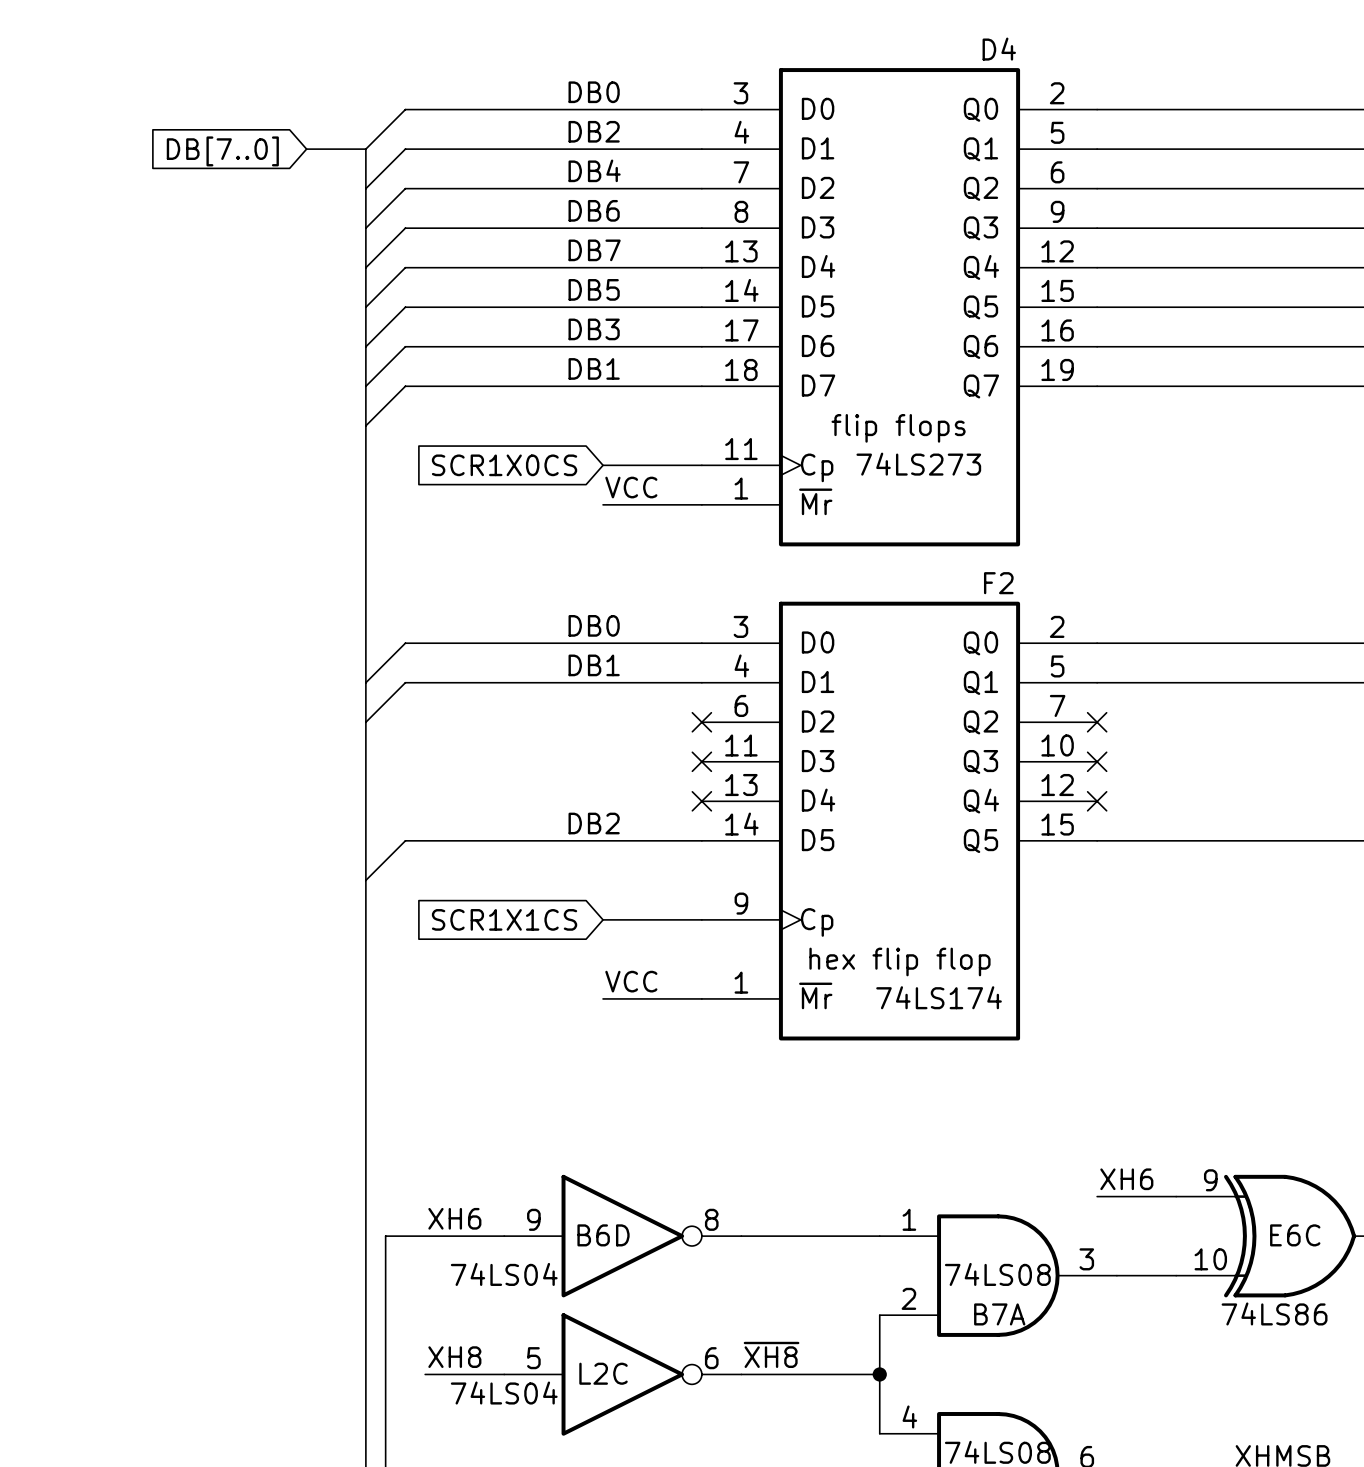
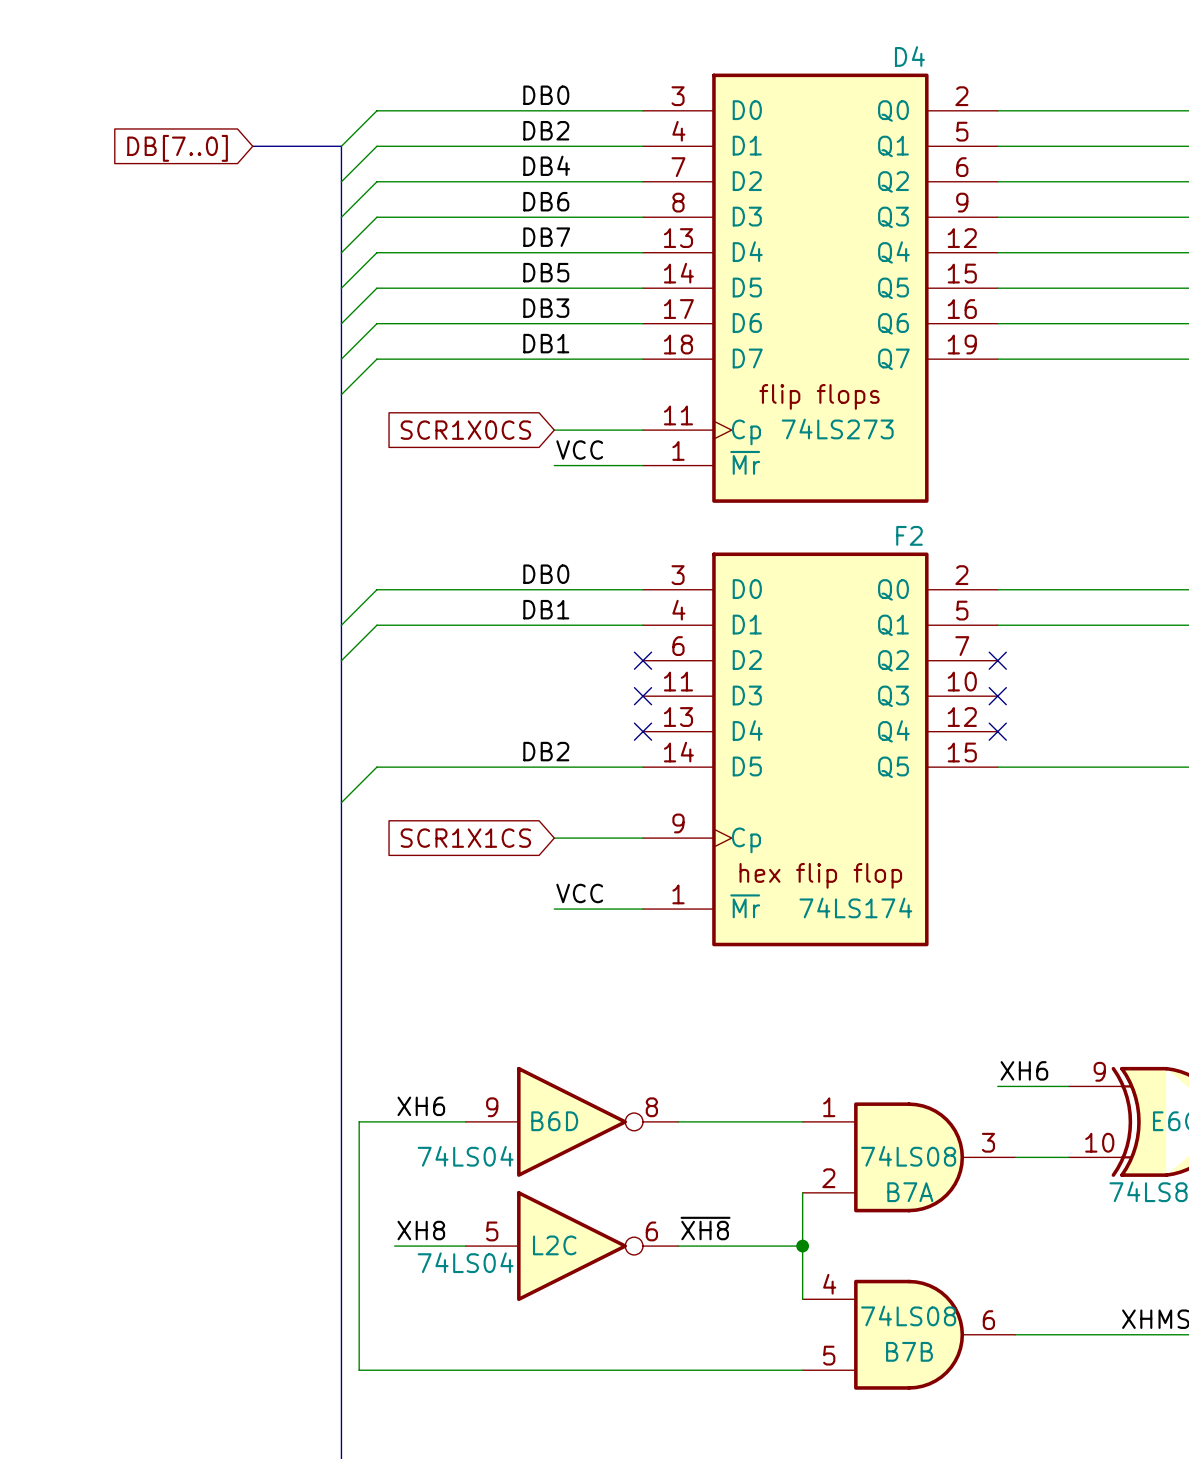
bus: none -> (252, 146) (288, 146)
global label position: DB[7..0] (222, 151) -> DB[7..0] (177, 148)

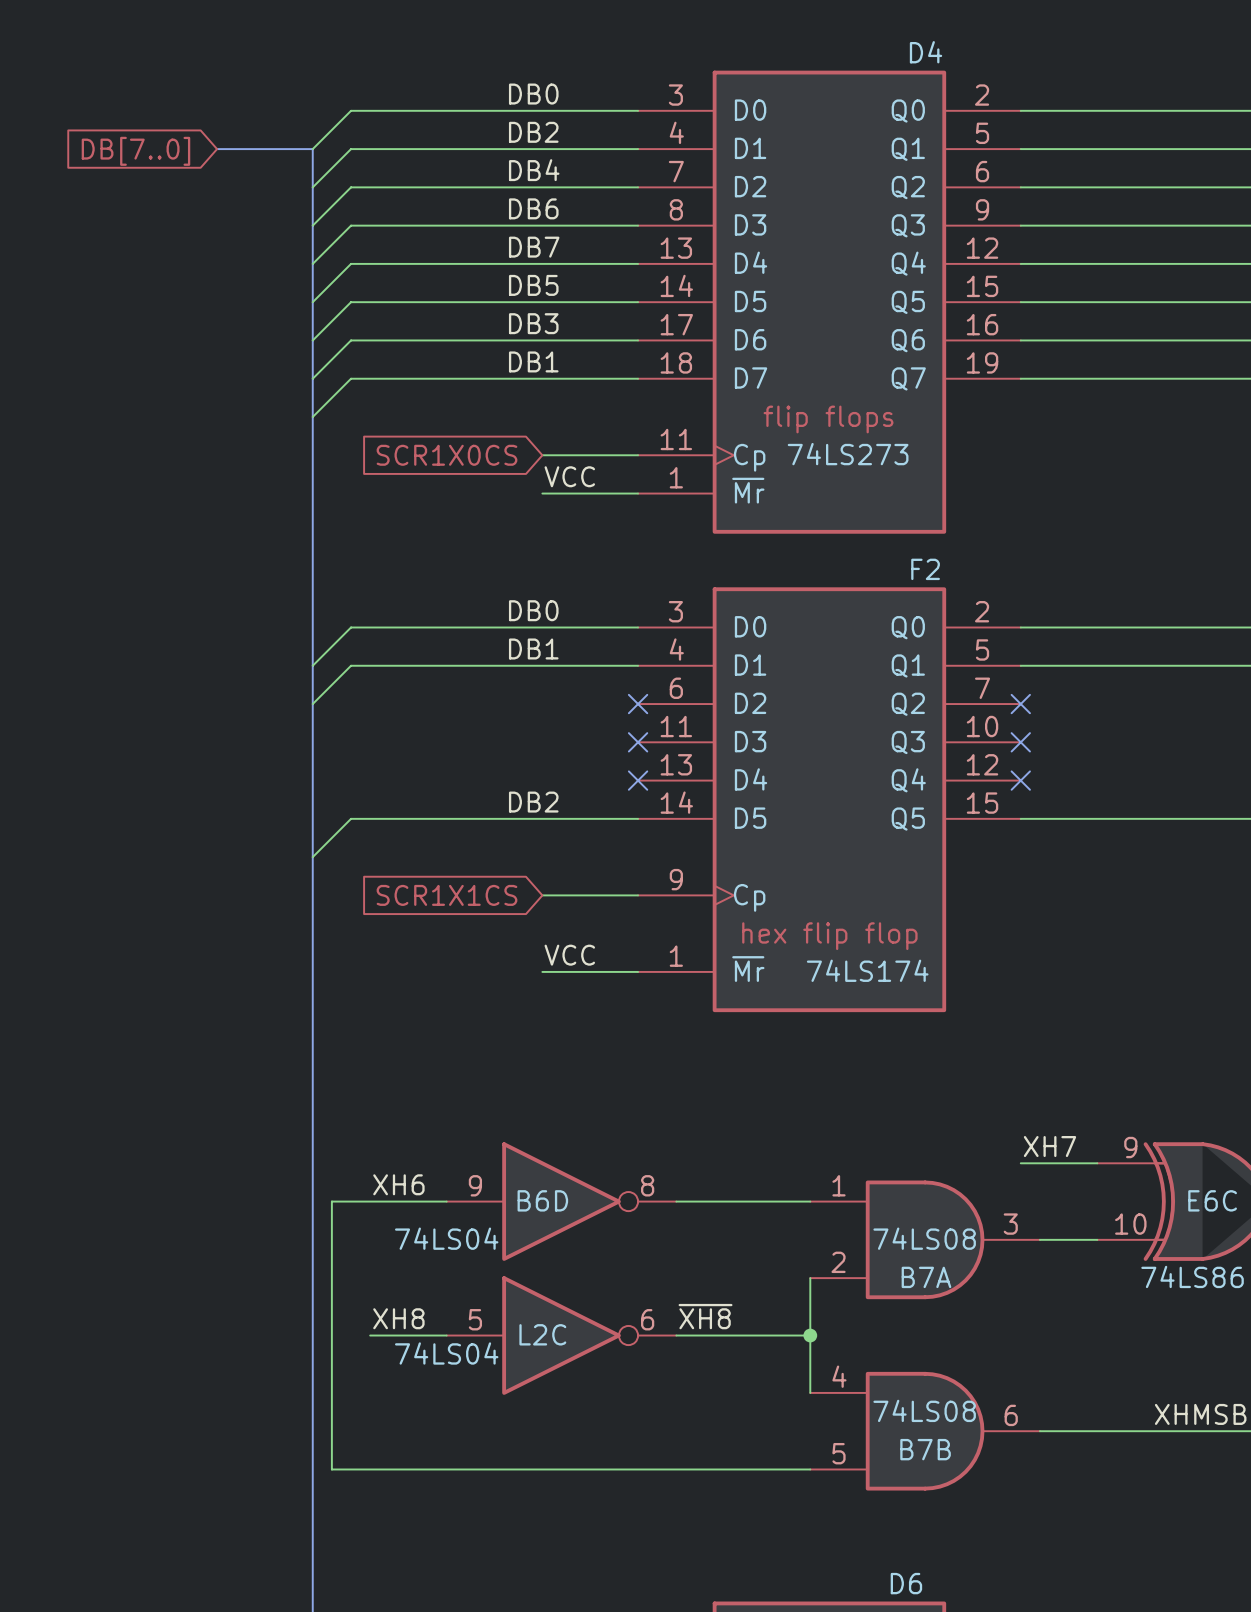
label: XH6 (1024, 1070) -> XH7 (1049, 1146)

